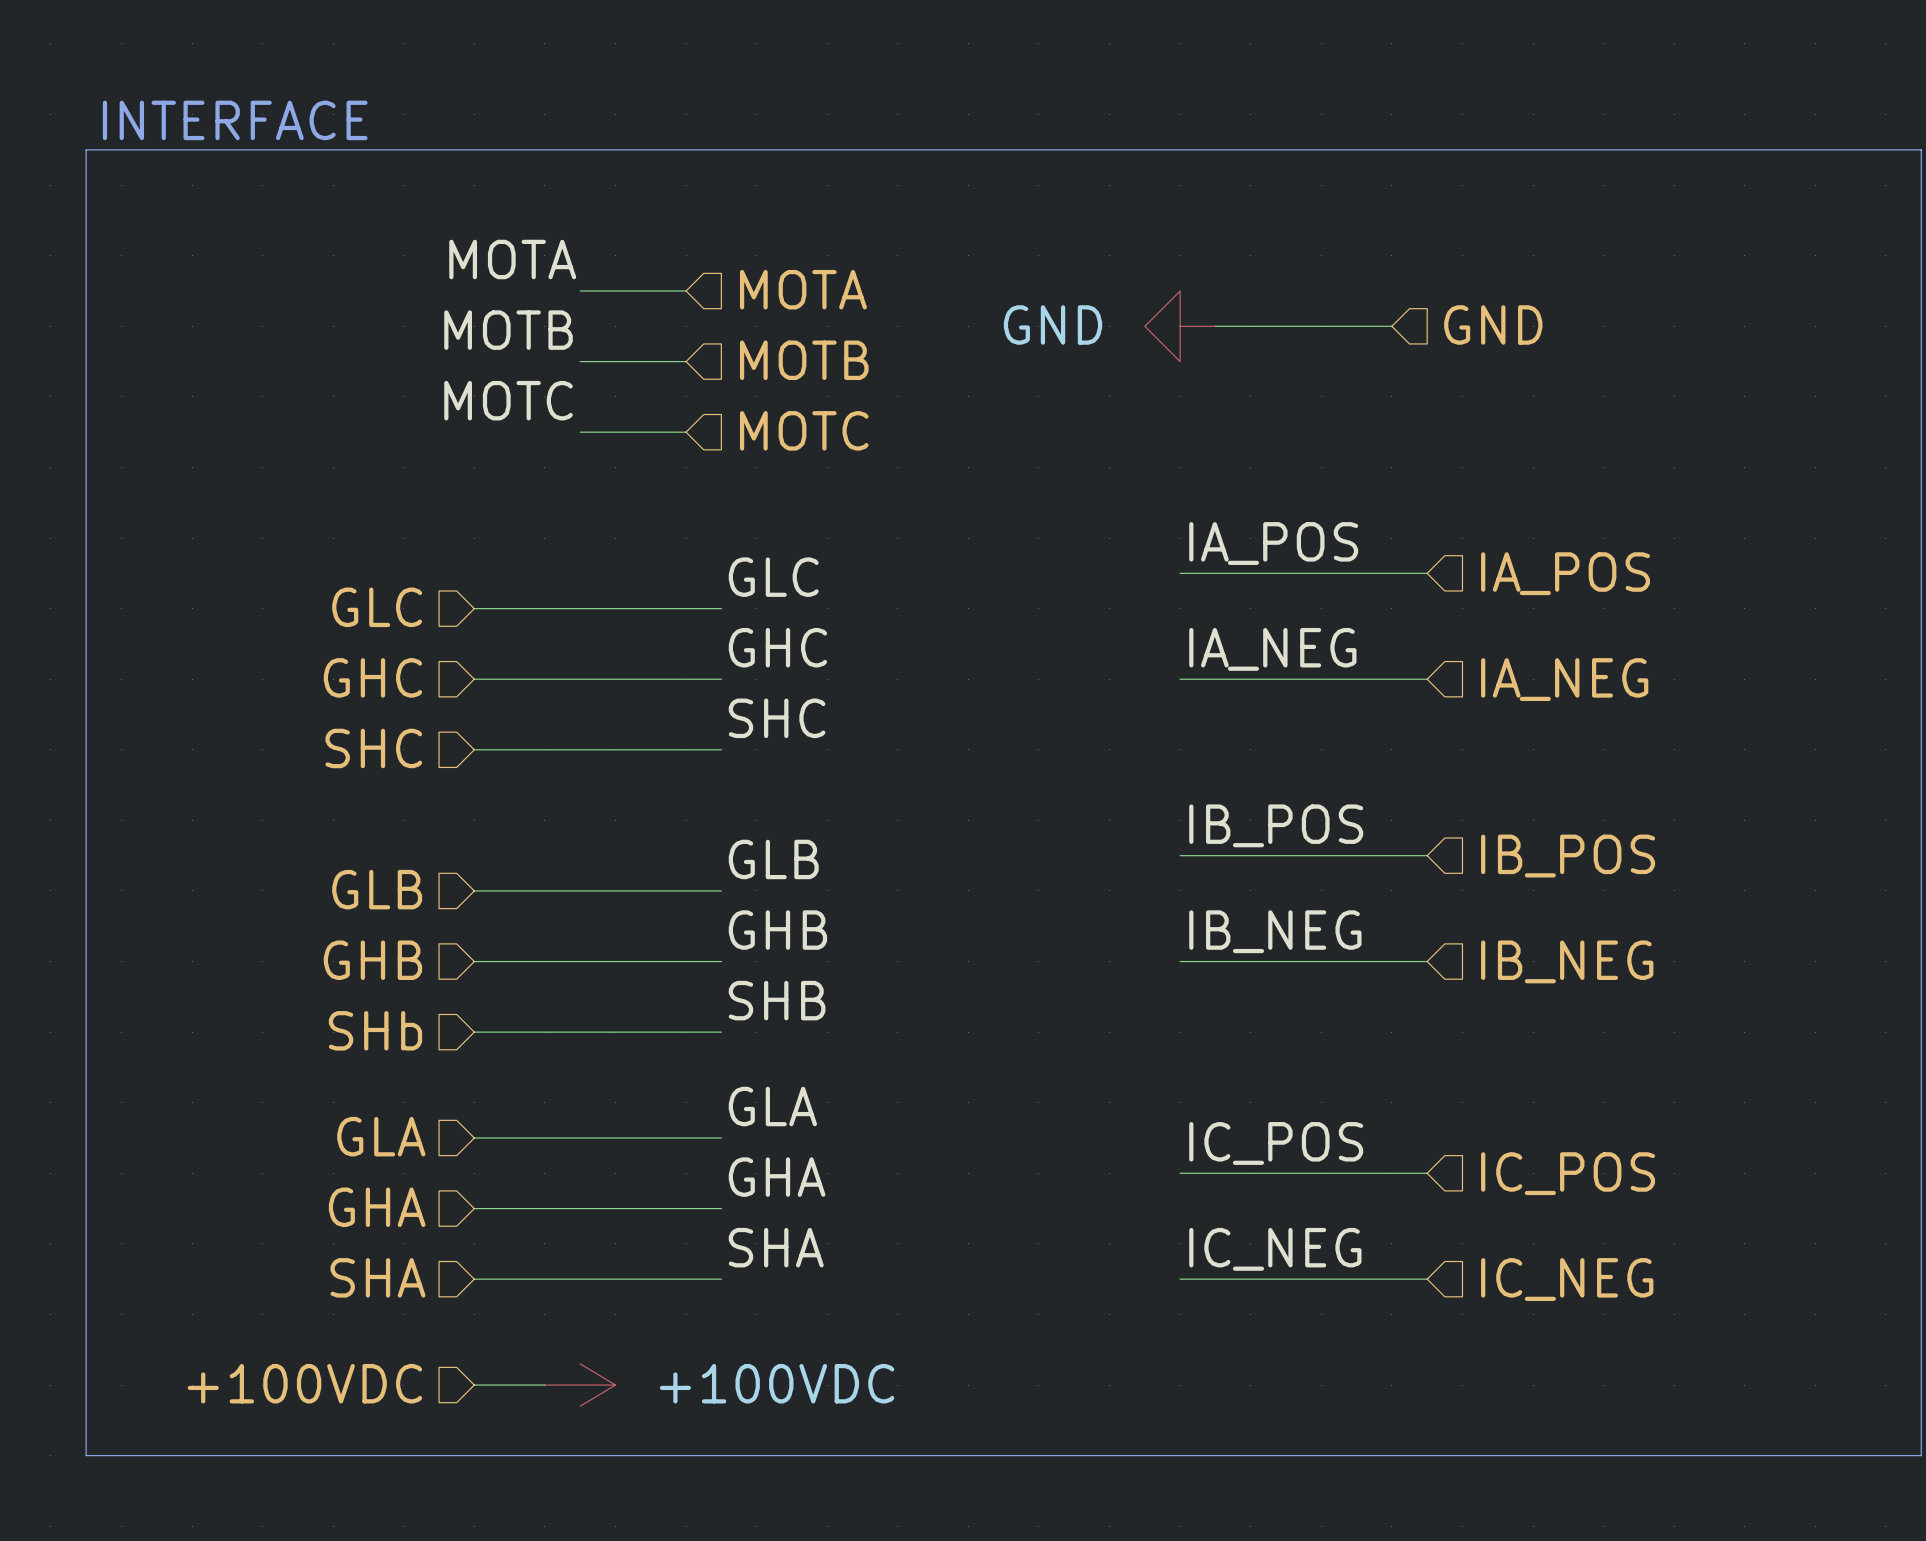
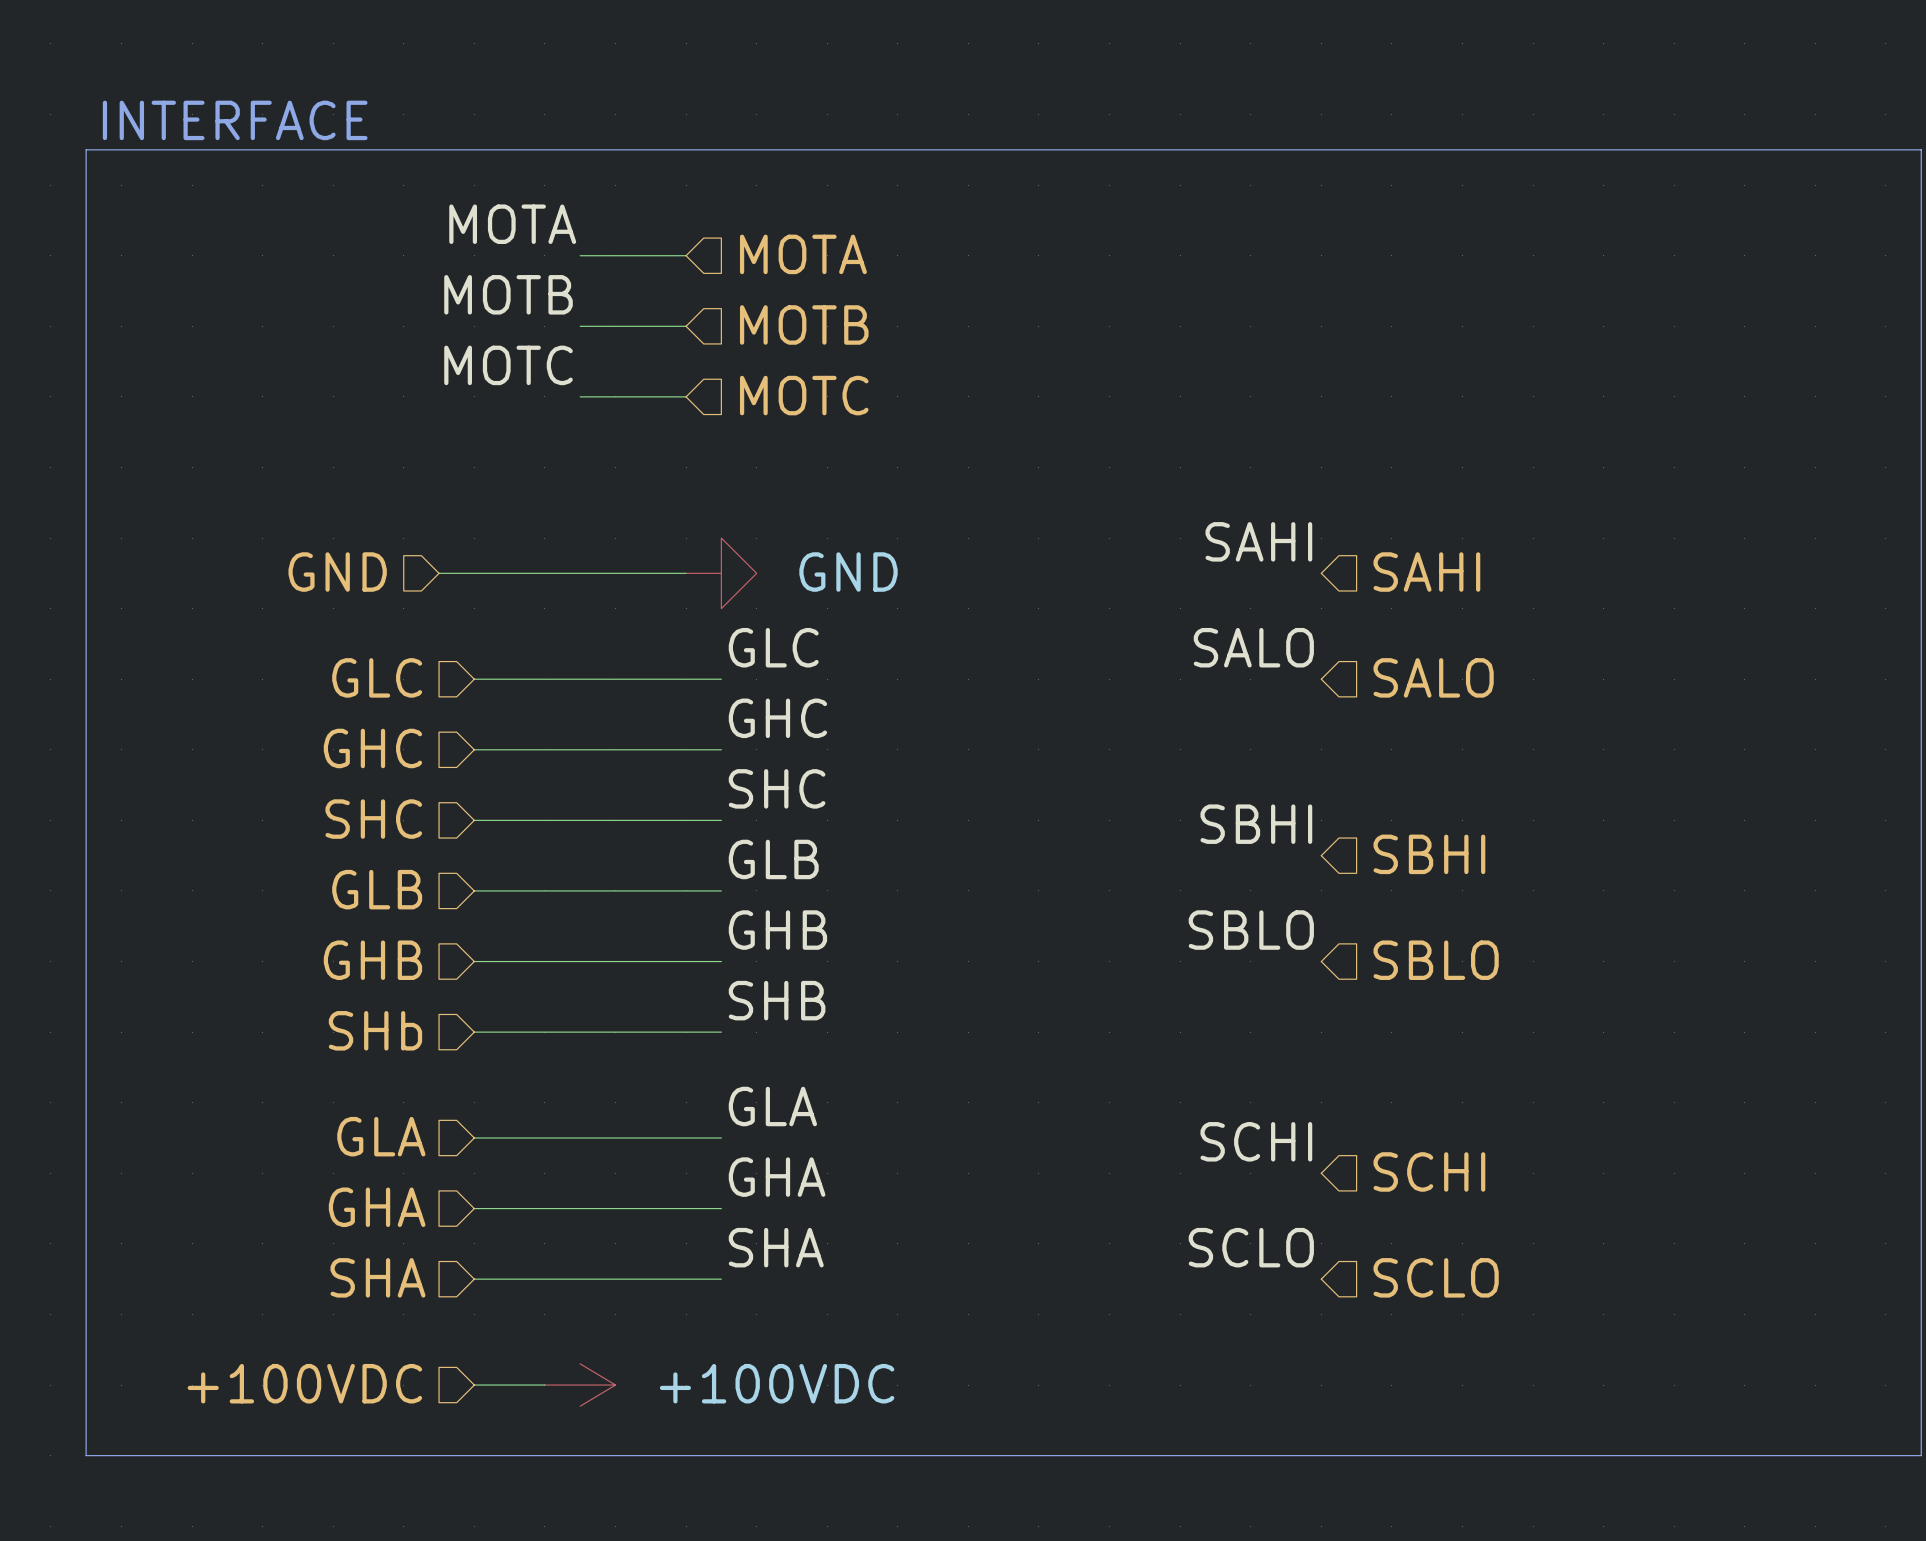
label position: MOTA (512, 259) -> MOTA (512, 224)
hierarchical label position: MOTA (803, 289) -> MOTA (803, 254)
wire: (580, 291) (686, 291) -> (580, 255) (686, 255)
hierarchical label: GND (1493, 324) -> none
power symbol rotation: 0° (1180, 326) -> 180° (721, 573)
power symbol position: GND (1180, 326) -> GND (721, 573)
wire: (1215, 326) (1391, 326) -> none
label position: MOTB (508, 330) -> MOTB (508, 294)
hierarchical label position: MOTB (804, 360) -> MOTB (804, 324)
wire: (580, 361) (686, 361) -> (580, 326) (686, 326)
label position: MOTC (508, 400) -> MOTC (508, 365)
hierarchical label position: MOTC (804, 430) -> MOTC (804, 395)
wire: (580, 432) (686, 432) -> (580, 396) (686, 396)
label: none -> SAHI (1258, 541)
label: IA_POS (1273, 543) -> none
hierarchical label: none -> GND (337, 572)
hierarchical label: none -> SAHI (1426, 572)
wire: (1180, 573) (1427, 573) -> none
hierarchical label: IA_POS (1565, 573) -> none
label: GLC (773, 577) -> none
hierarchical label: GLC (377, 607) -> none
wire: (474, 608) (721, 608) -> (439, 573) (686, 573)
label: GHC (777, 647) -> GLC (773, 647)
label: none -> SALO (1253, 647)
label: IA_NEG (1272, 649) -> none
hierarchical label: GHC (372, 677) -> GLC (377, 677)
hierarchical label: none -> SALO (1433, 677)
wire: (1180, 679) (1427, 679) -> none
hierarchical label: IA_NEG (1564, 679) -> none
label: SHC (777, 718) -> GHC (777, 718)
hierarchical label: SHC (373, 748) -> GHC (372, 748)
label: none -> SHC (777, 788)
hierarchical label: none -> SHC (373, 819)
wire: none -> (474, 820) (721, 820)
label: none -> SBHI (1256, 824)
label: IB_POS (1276, 825) -> none
hierarchical label: none -> SBHI (1429, 854)
wire: (1180, 855) (1427, 855) -> none
hierarchical label: IB_POS (1568, 856) -> none
label: none -> SBLO (1251, 930)
label: IB_NEG (1275, 931) -> none
hierarchical label: none -> SBLO (1436, 960)
wire: (1180, 961) (1427, 961) -> none
hierarchical label: IB_NEG (1567, 961) -> none
label: none -> SCHI (1256, 1141)
label: IC_POS (1276, 1143) -> none
hierarchical label: none -> SCHI (1429, 1171)
wire: (1180, 1173) (1427, 1173) -> none
hierarchical label: IC_POS (1568, 1173) -> none
label: none -> SCLO (1251, 1247)
label: IC_NEG (1275, 1249) -> none
hierarchical label: none -> SCLO (1436, 1277)
wire: (1180, 1279) (1427, 1279) -> none
hierarchical label: IC_NEG (1567, 1279) -> none

